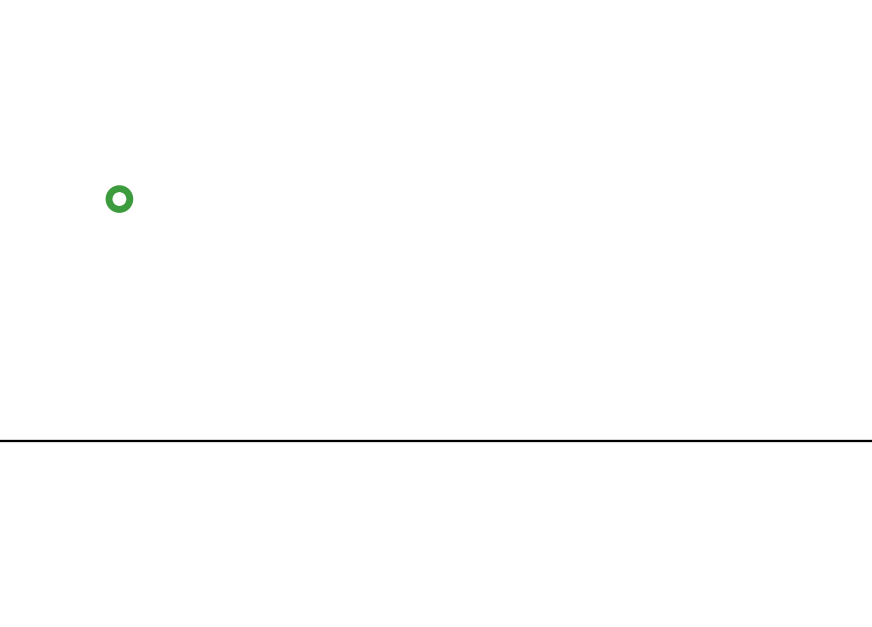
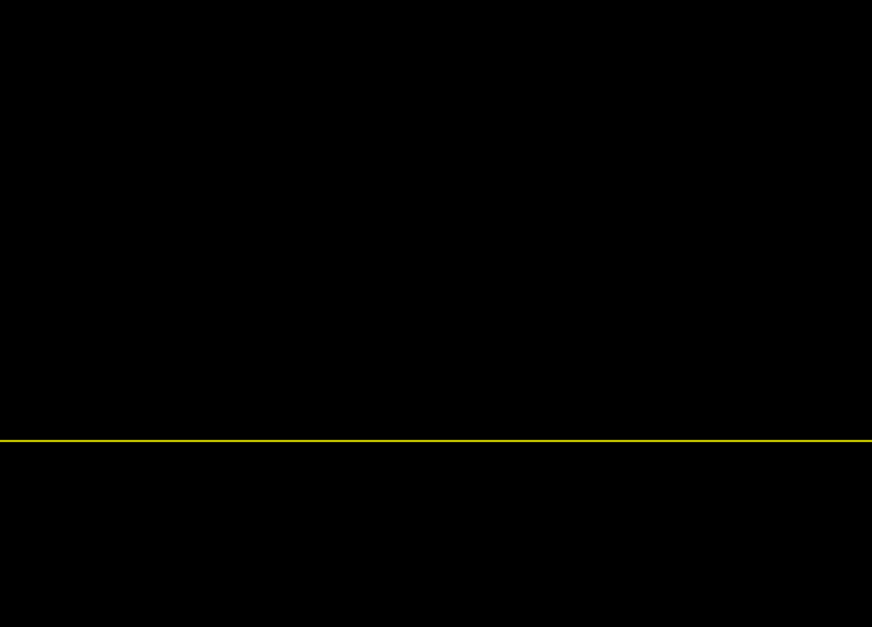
via: (119, 199) -> none

